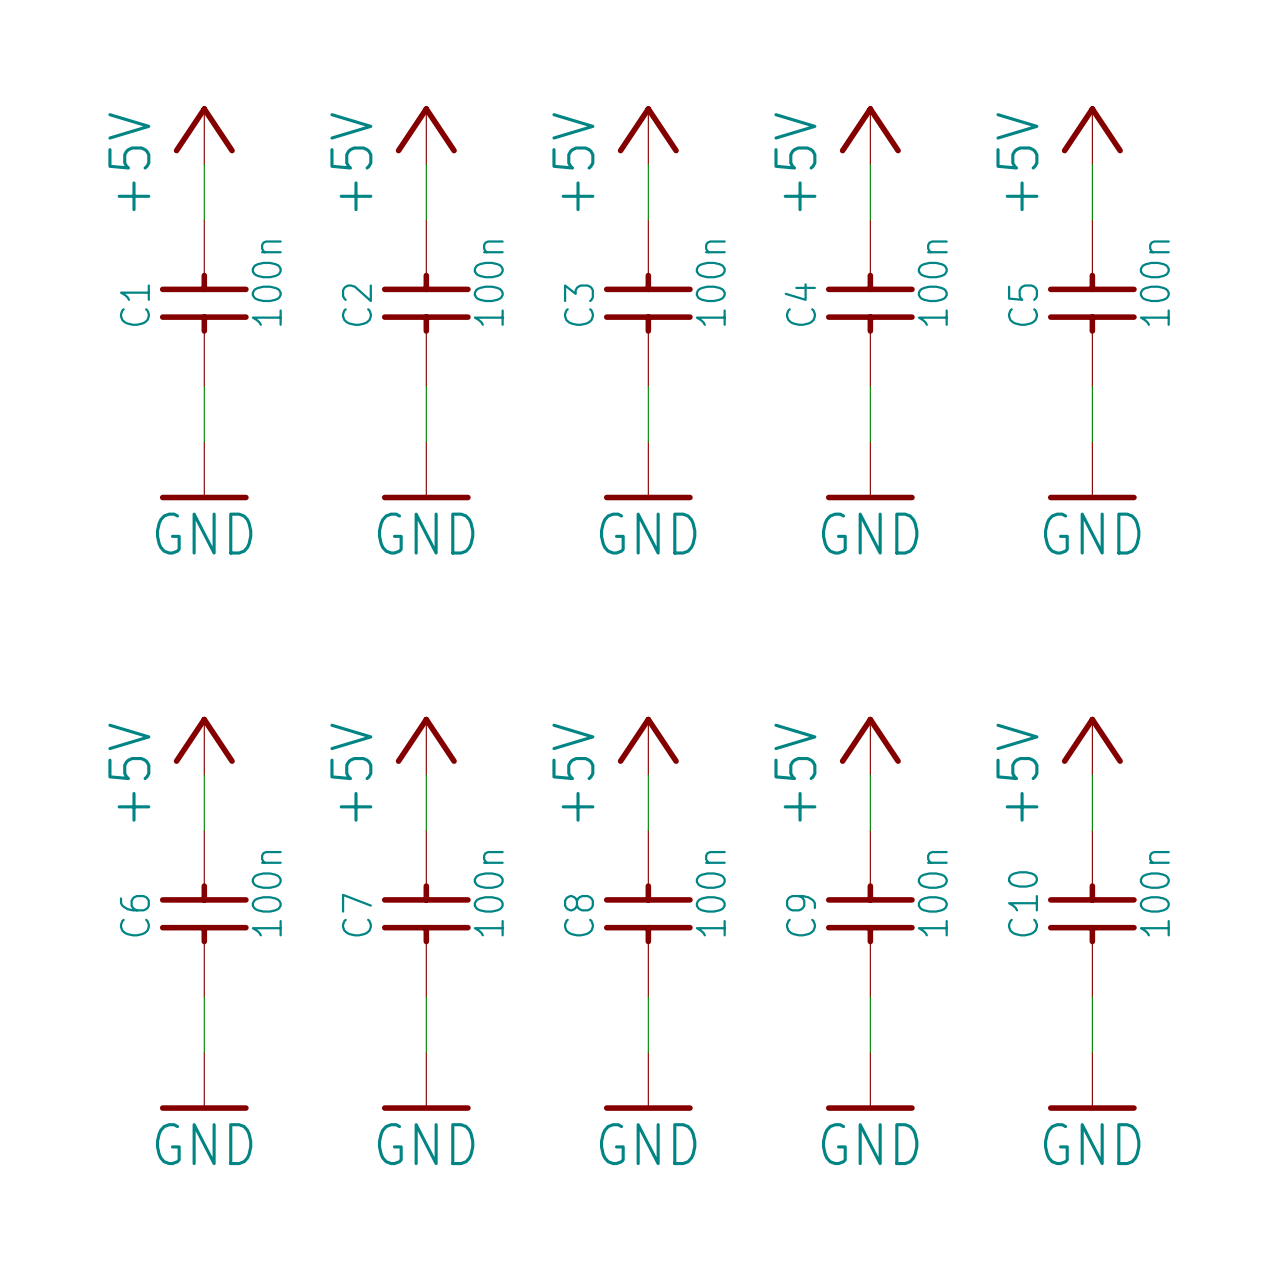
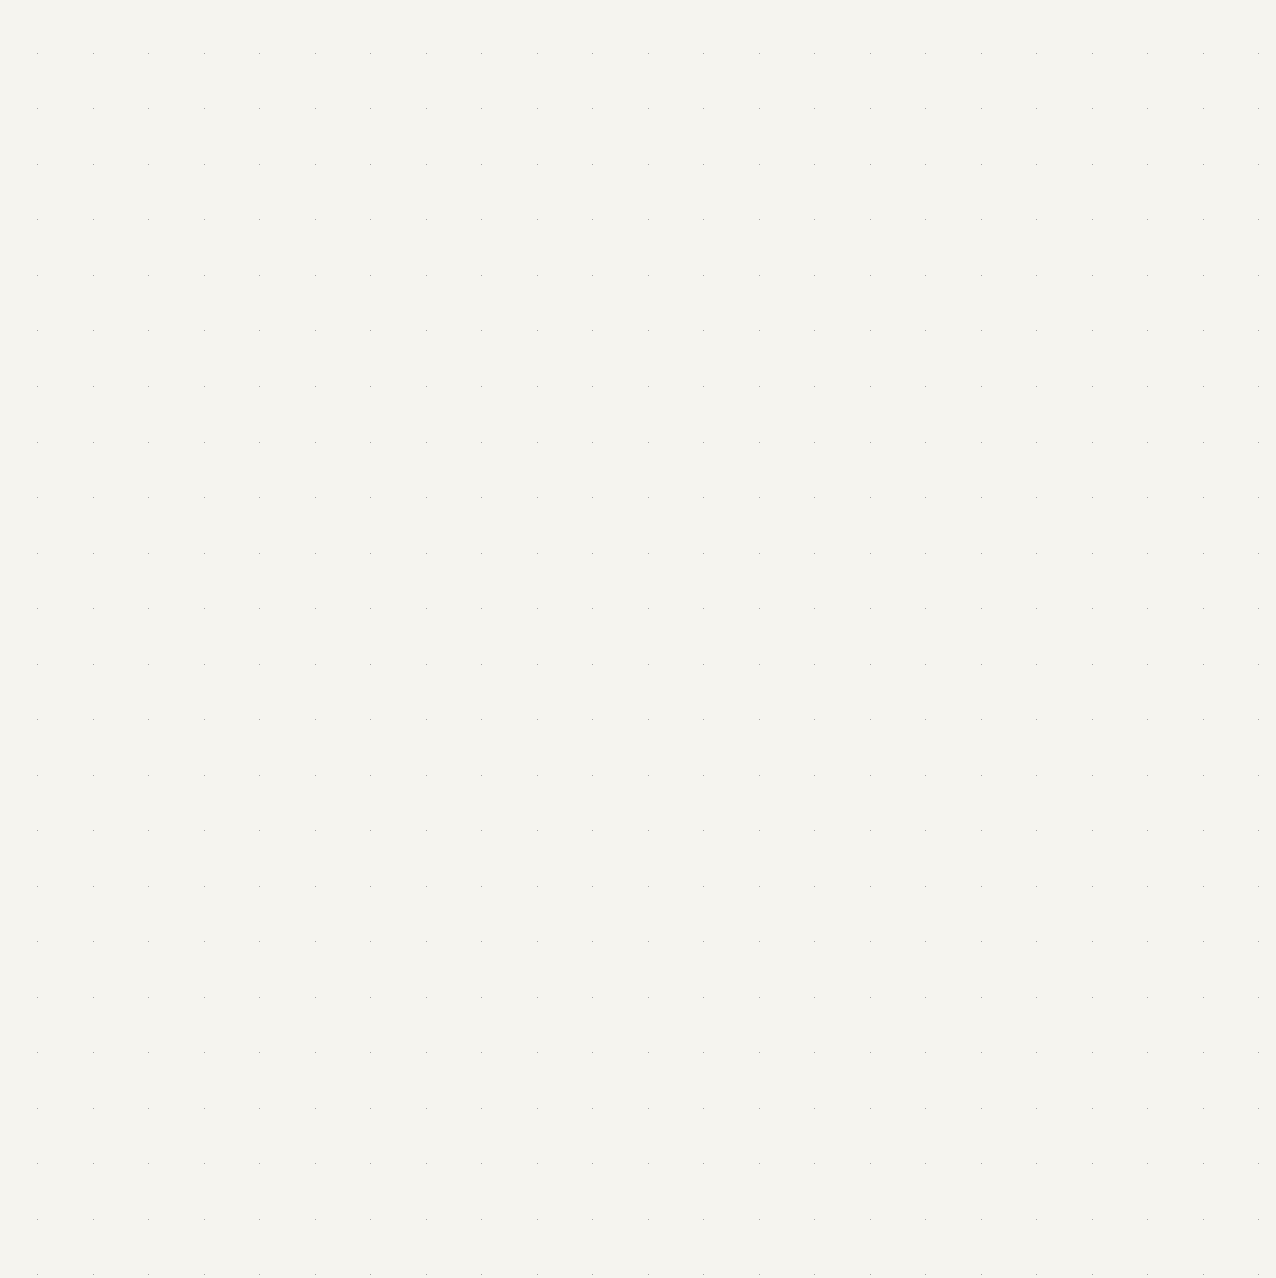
power symbol: +5V (204, 135) -> none
power symbol: +5V (426, 135) -> none
power symbol: +5V (648, 135) -> none
power symbol: +5V (870, 135) -> none
power symbol: +5V (1092, 135) -> none
wire: (204, 164) (204, 219) -> none
wire: (426, 164) (426, 219) -> none
wire: (648, 164) (648, 219) -> none
wire: (870, 164) (870, 219) -> none
wire: (1092, 164) (1092, 219) -> none
C1: 100n (204, 303) -> none
C2: 100n (426, 303) -> none
C3: 100n (648, 303) -> none
C4: 100n (870, 303) -> none
C5: 100n (1092, 303) -> none
wire: (204, 386) (204, 442) -> none
wire: (426, 386) (426, 442) -> none
wire: (648, 386) (648, 442) -> none
wire: (870, 386) (870, 442) -> none
wire: (1092, 386) (1092, 442) -> none
power symbol: GND (204, 471) -> none
power symbol: GND (426, 471) -> none
power symbol: GND (648, 471) -> none
power symbol: GND (870, 471) -> none
power symbol: GND (1092, 471) -> none
power symbol: +5V (204, 745) -> none
power symbol: +5V (426, 745) -> none
power symbol: +5V (648, 745) -> none
power symbol: +5V (870, 745) -> none
power symbol: +5V (1092, 745) -> none
wire: (204, 775) (204, 830) -> none
wire: (426, 775) (426, 830) -> none
wire: (648, 775) (648, 830) -> none
wire: (870, 775) (870, 830) -> none
wire: (1092, 775) (1092, 830) -> none
C6: 100n (204, 913) -> none
C7: 100n (426, 913) -> none
C8: 100n (648, 913) -> none
C9: 100n (870, 913) -> none
C10: 100n (1092, 913) -> none
wire: (204, 997) (204, 1052) -> none
wire: (426, 997) (426, 1052) -> none
wire: (648, 997) (648, 1052) -> none
wire: (870, 997) (870, 1052) -> none
wire: (1092, 997) (1092, 1052) -> none
power symbol: GND (204, 1081) -> none
power symbol: GND (426, 1081) -> none
power symbol: GND (648, 1081) -> none
power symbol: GND (870, 1081) -> none
power symbol: GND (1092, 1081) -> none

